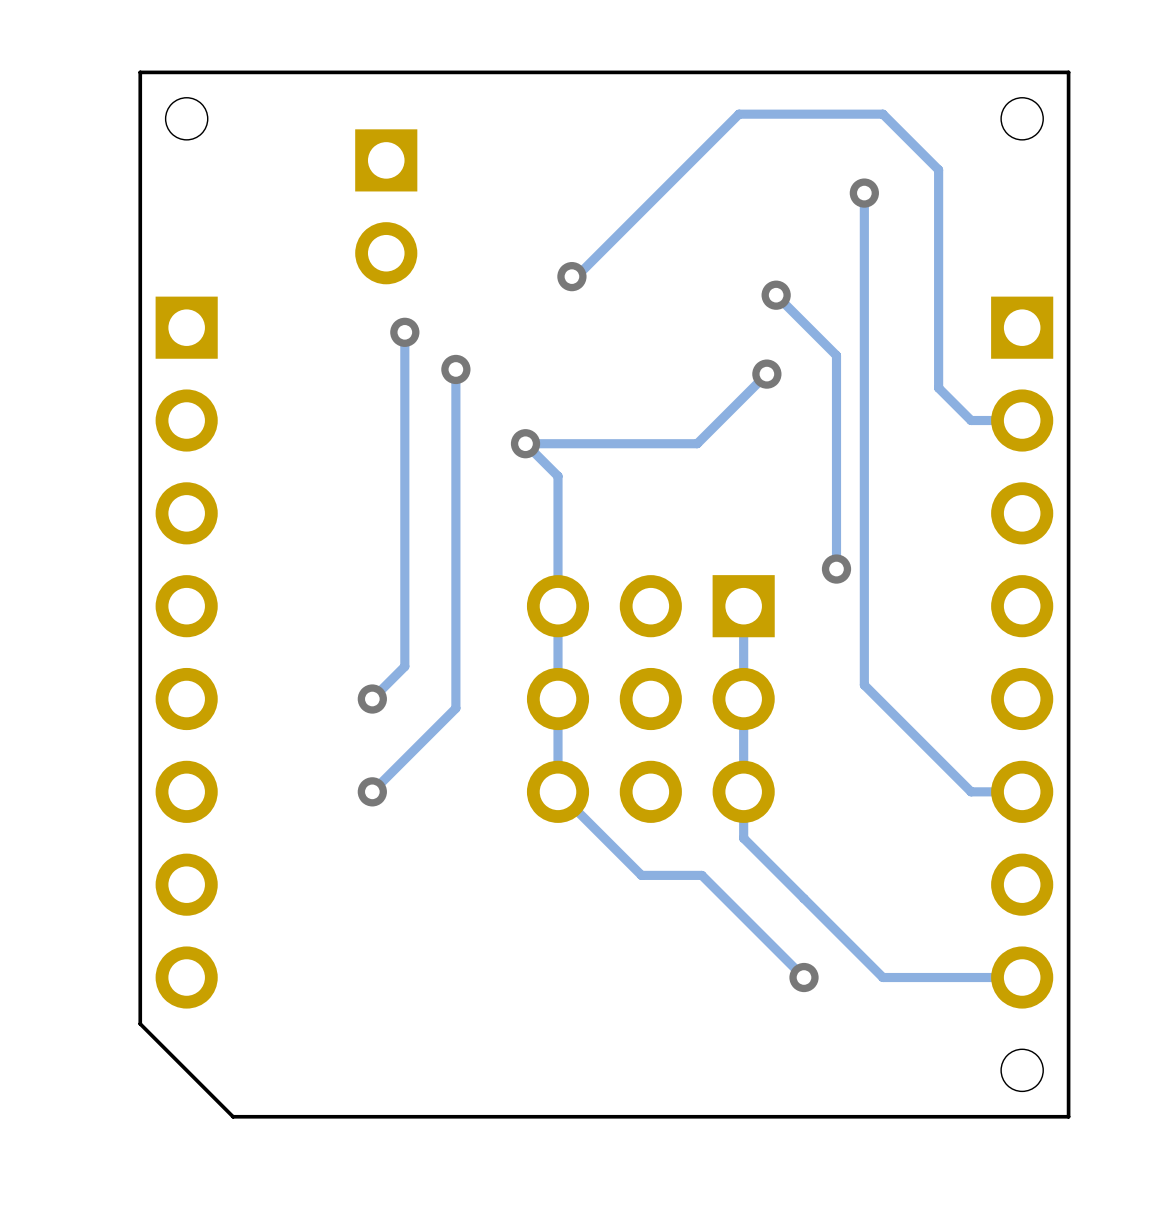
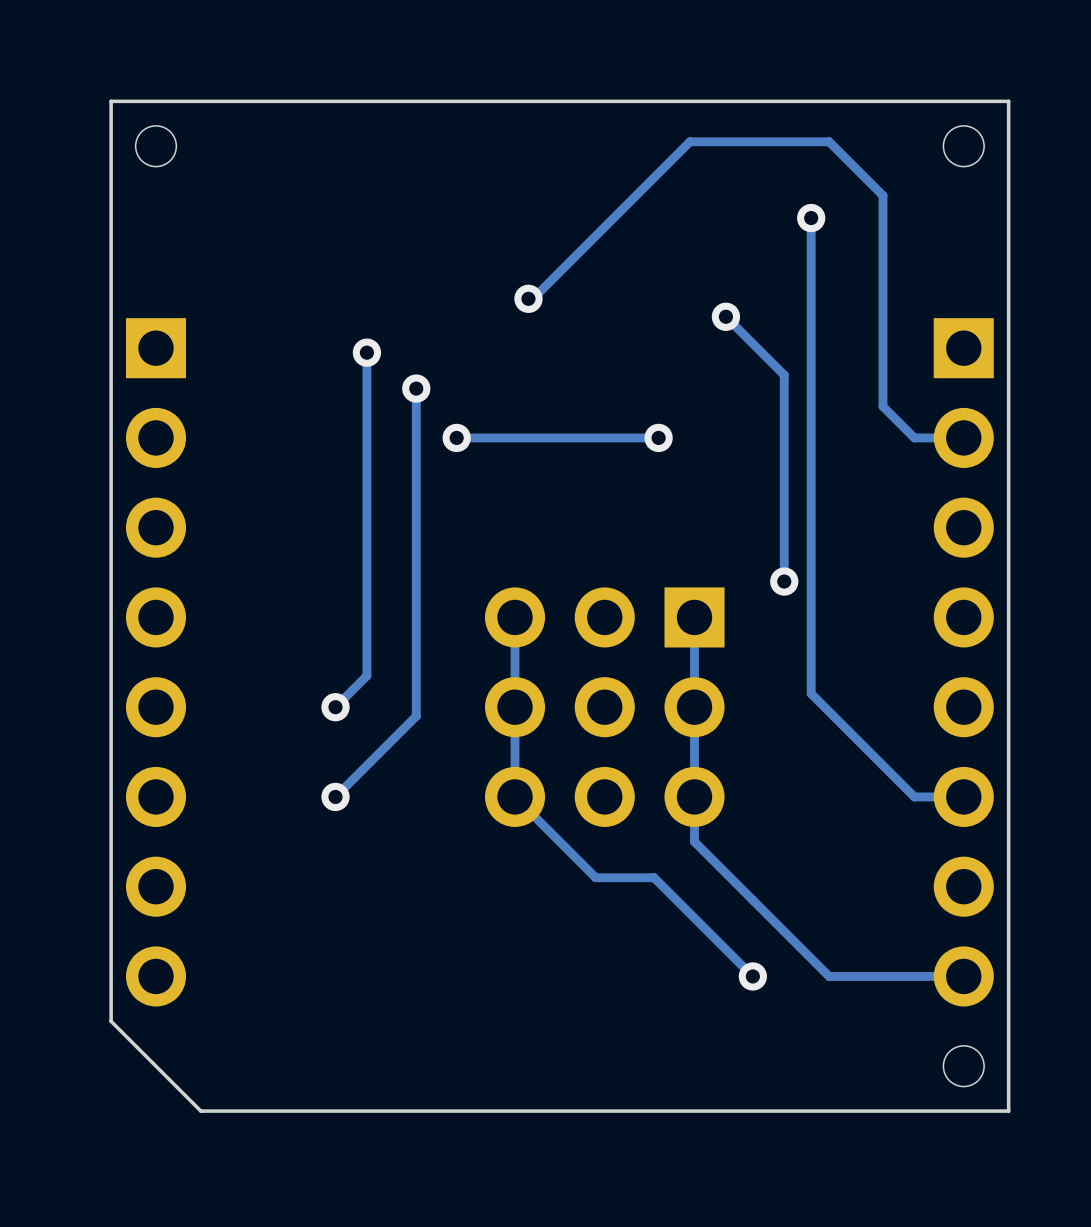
part: (386, 206) -> none
track: (766, 374) (697, 443) (525, 443) (558, 476) (558, 606) -> none
via position: (766, 374) -> (658, 437)
track: none -> (658, 437) (456, 437)
via position: (525, 443) -> (456, 437)

